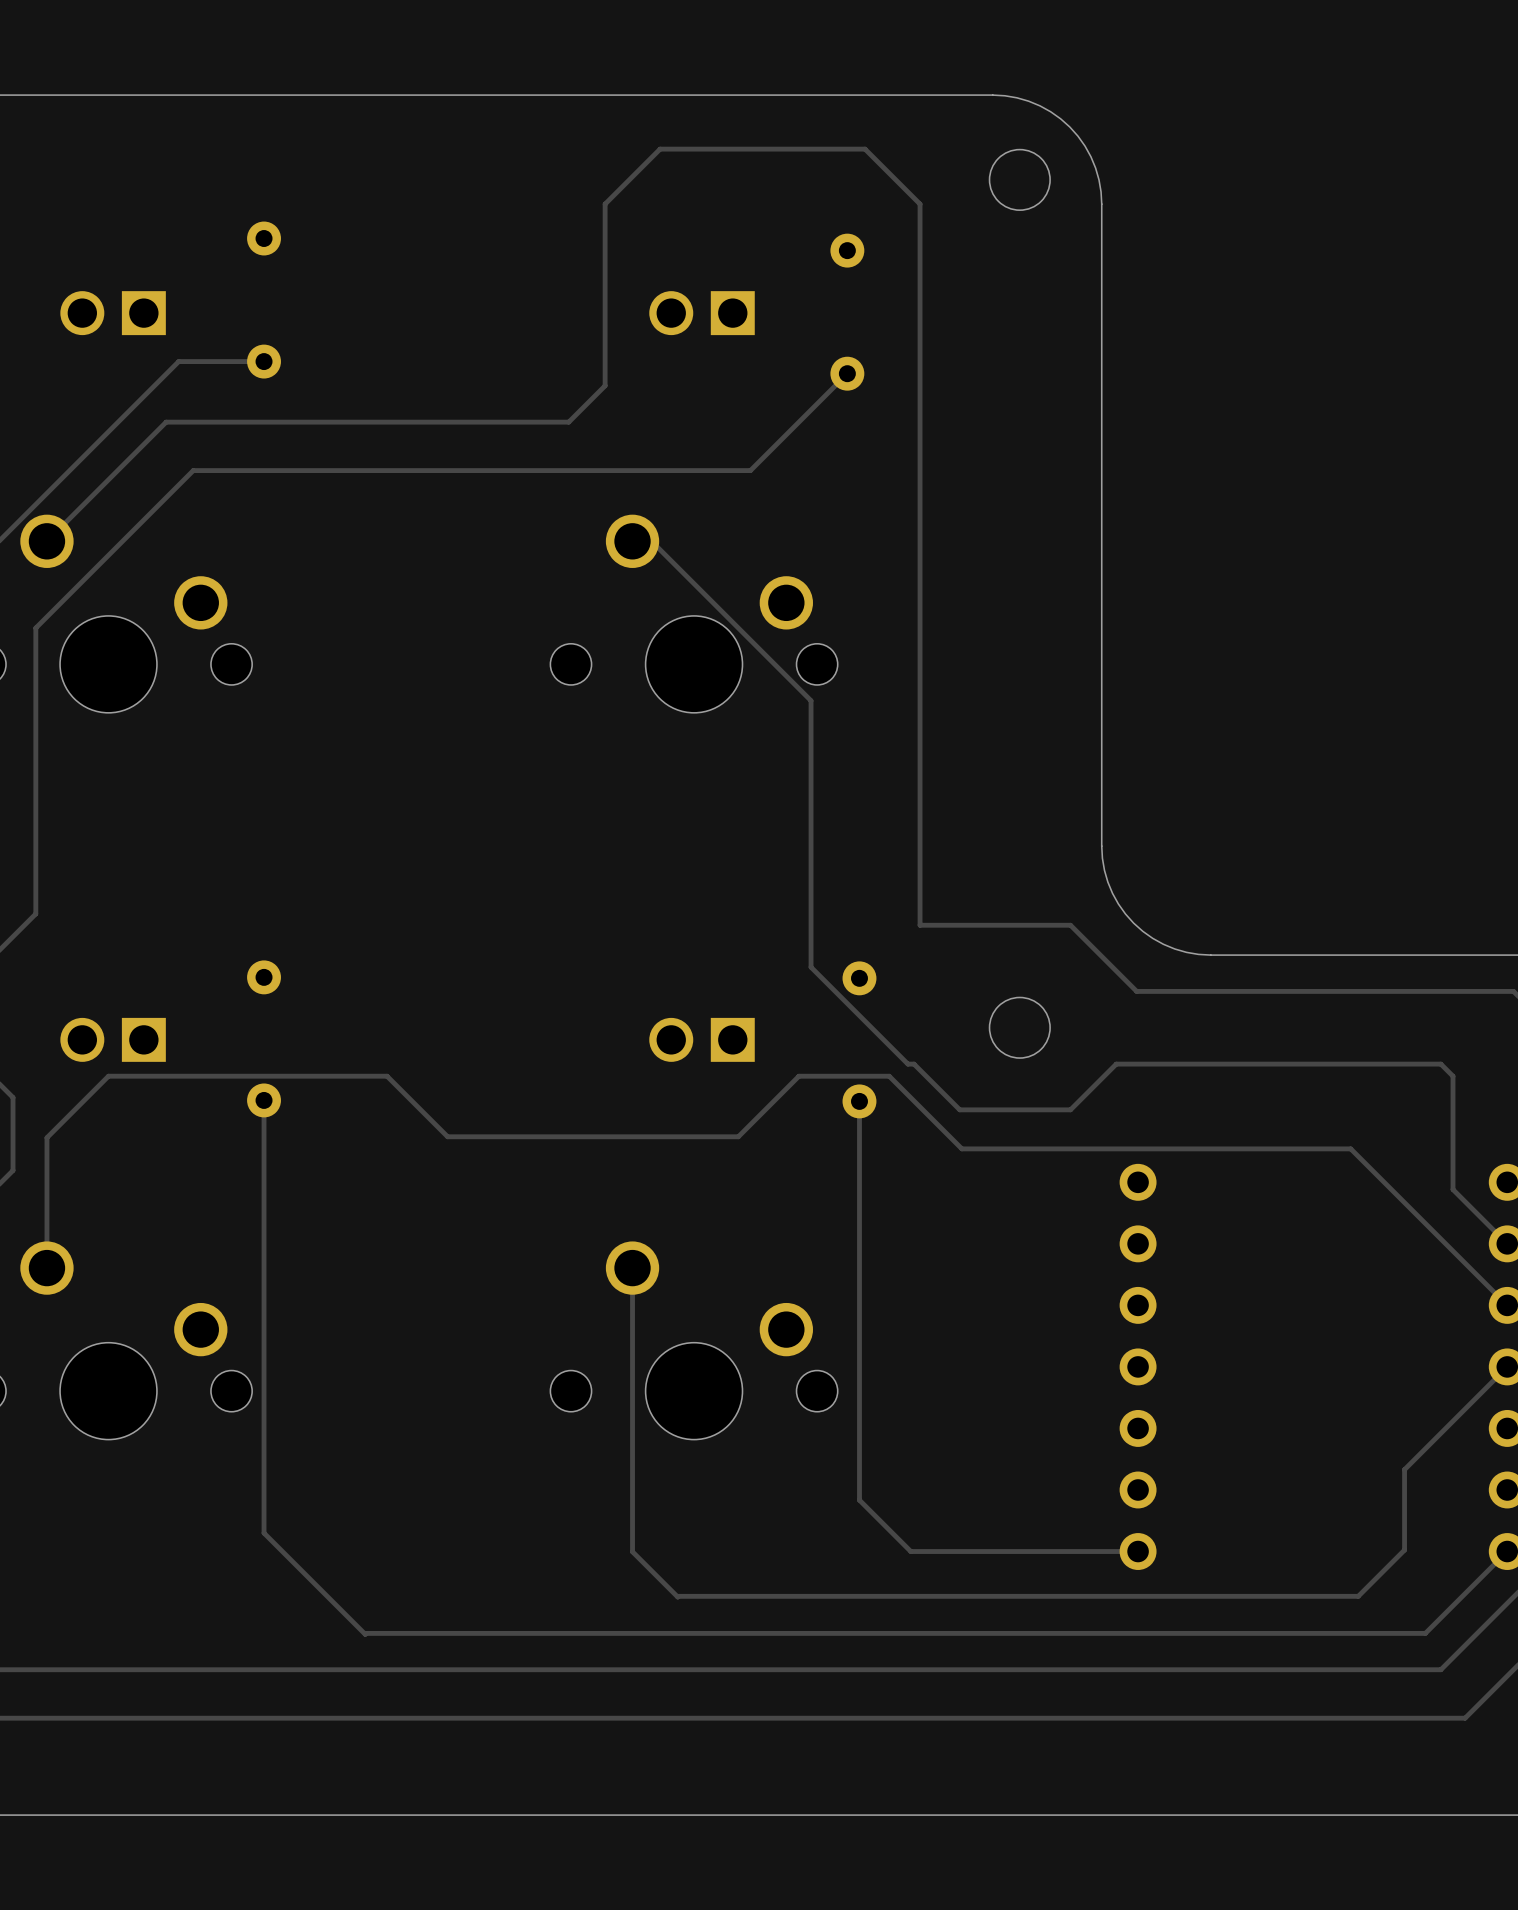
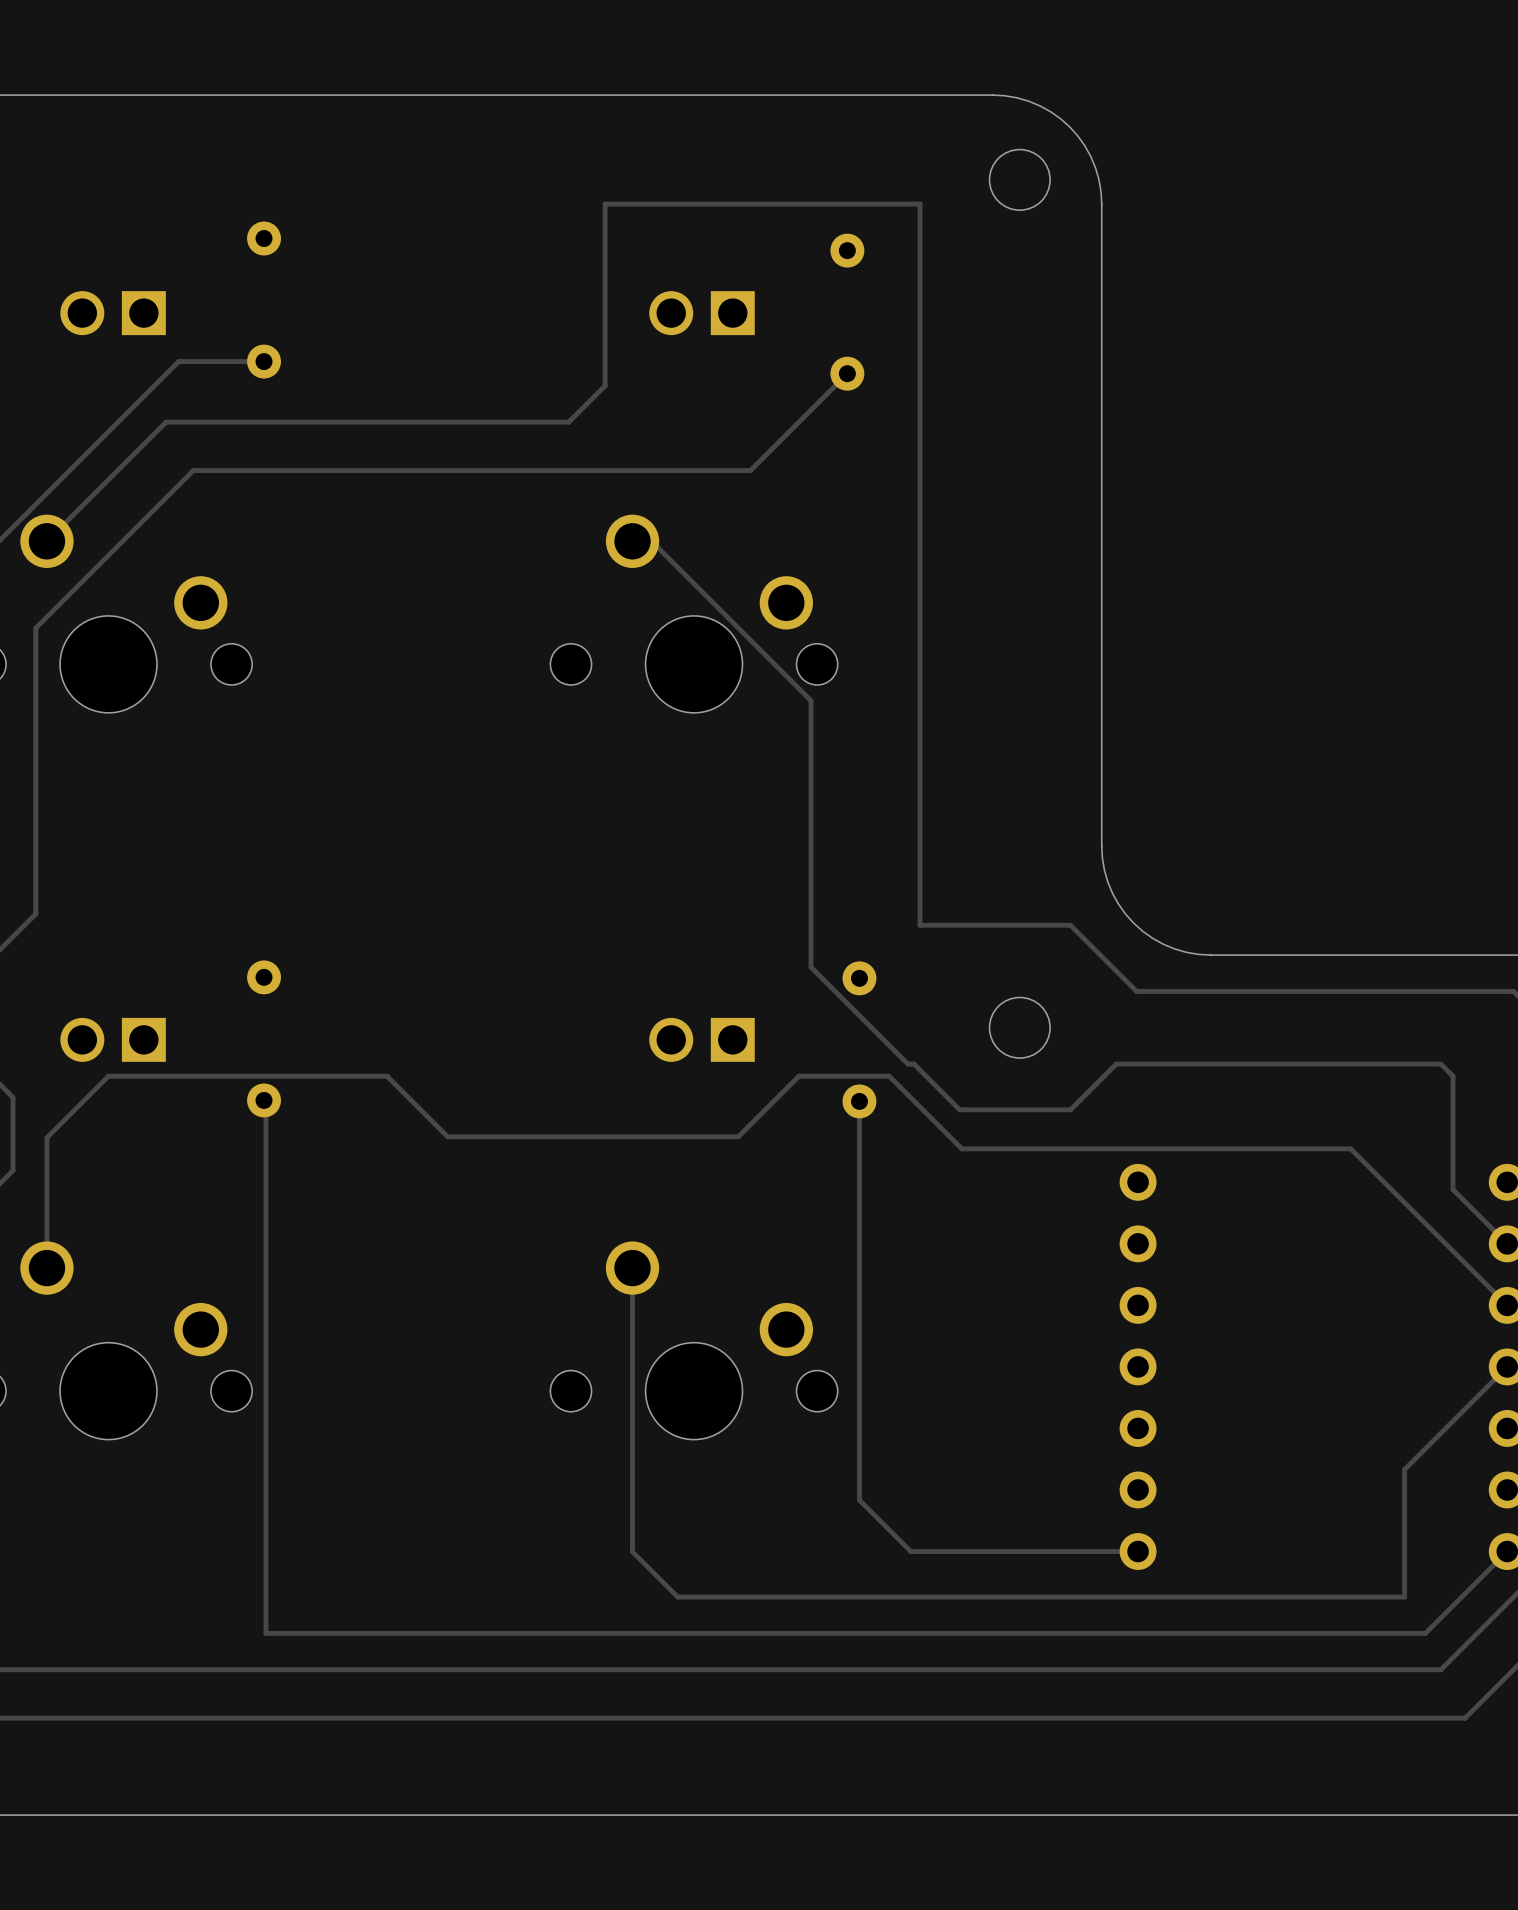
track: (920, 204) (865, 149) (660, 149) (605, 204) -> (920, 204) (605, 204)
track: (264, 1100) (264, 1533) (366, 1633) -> (265, 1102) (265, 1633) (366, 1633)
track: (1404, 1550) (1358, 1596) (677, 1597) -> (1404, 1550) (1404, 1597) (677, 1597)

